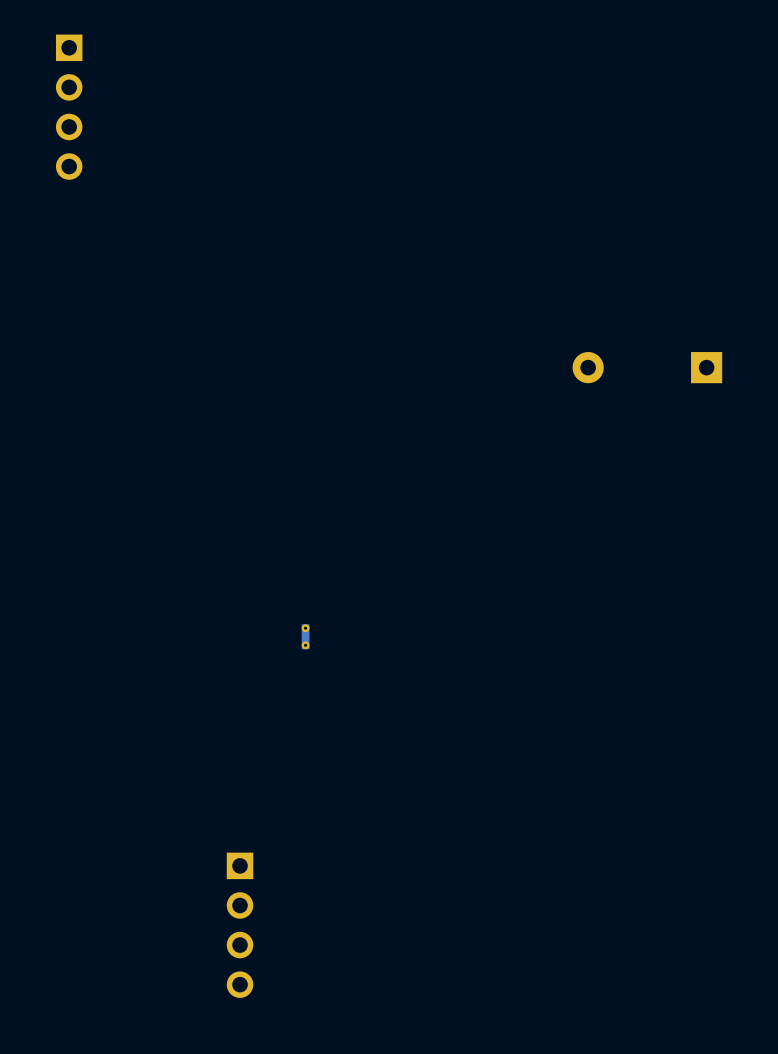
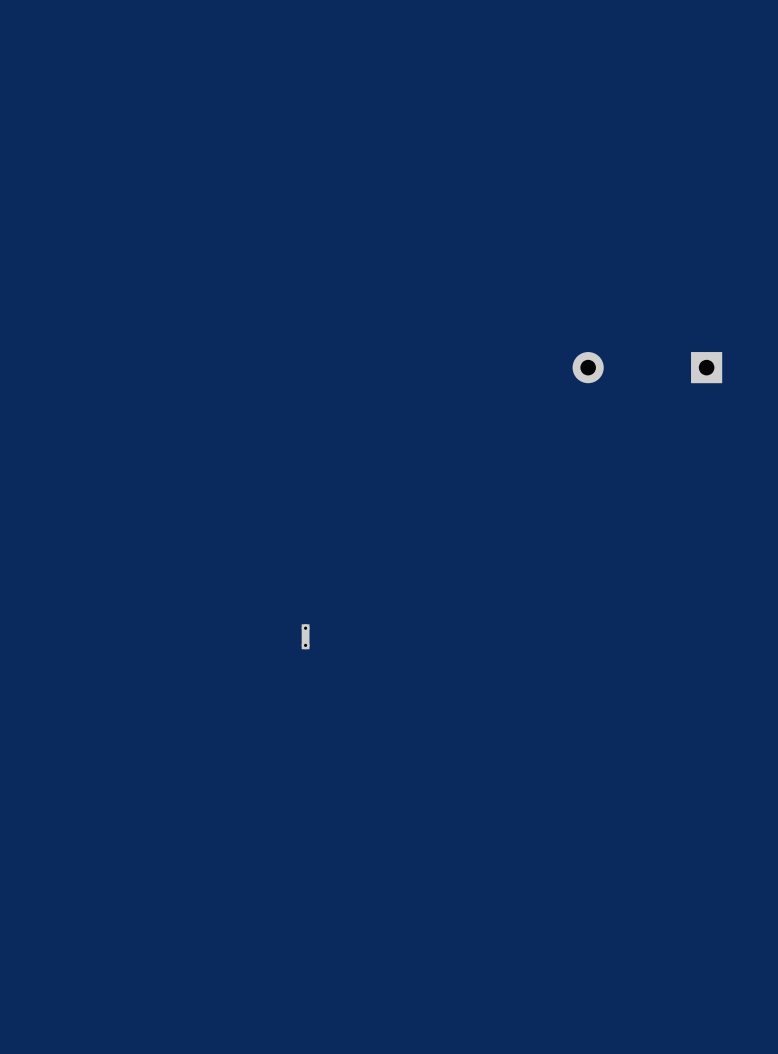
part: (69, 107) -> none
part: (240, 925) -> none

